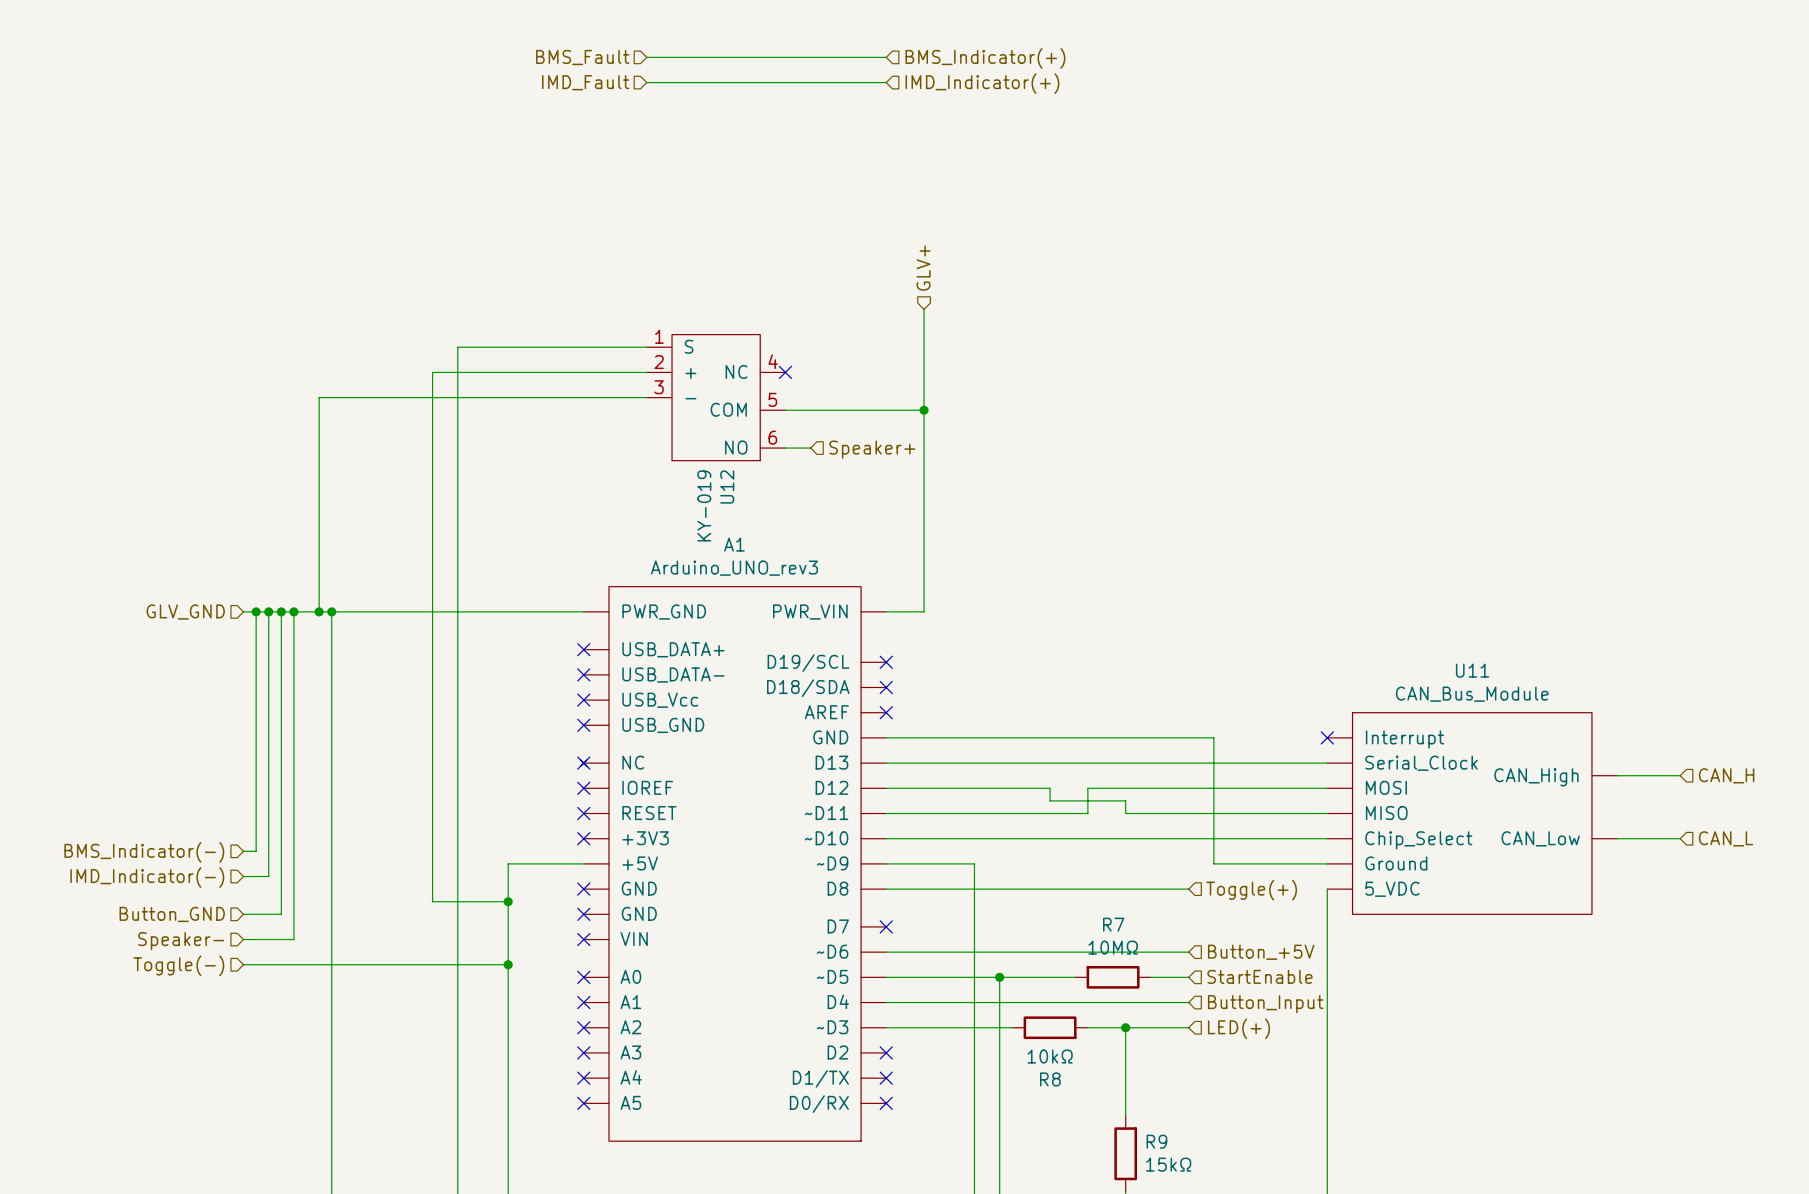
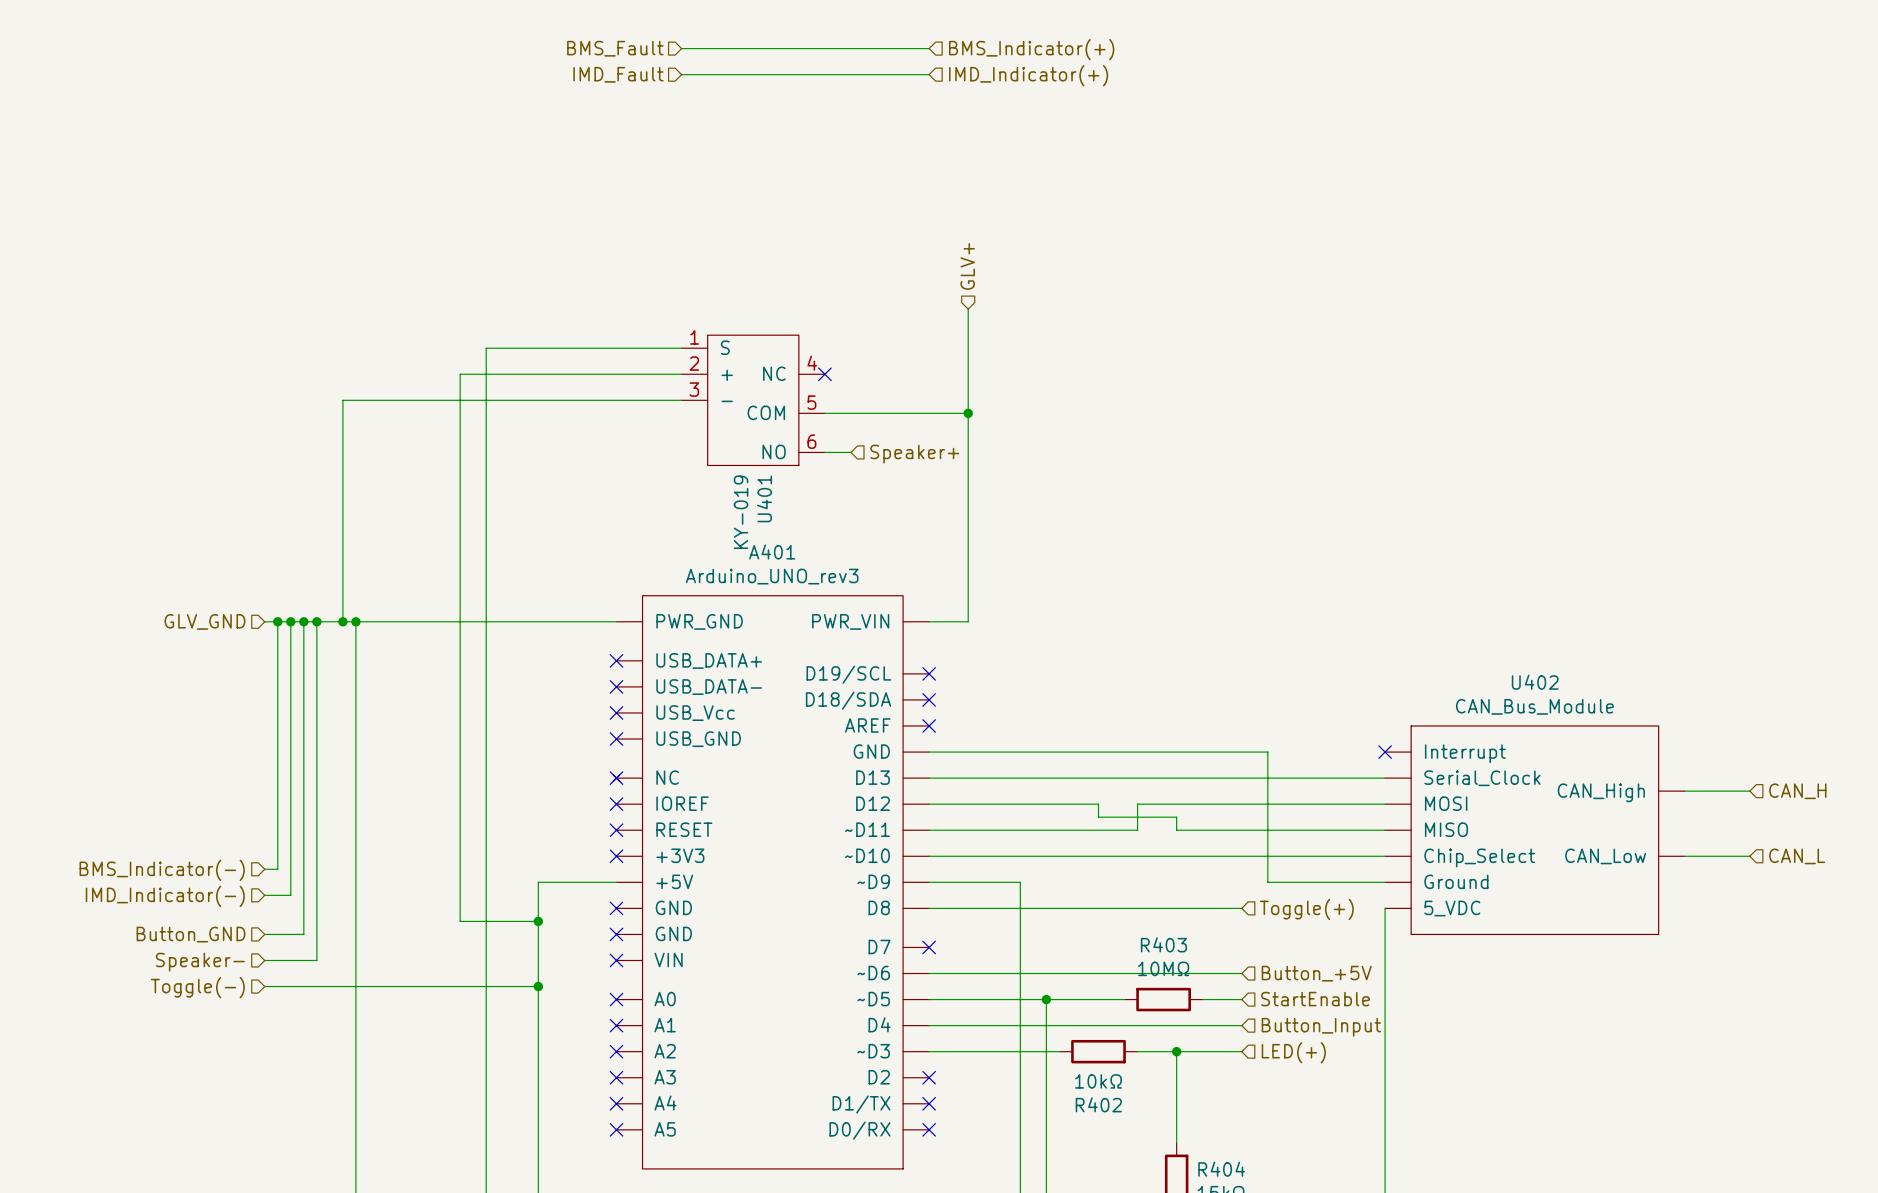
U12 name: U12 (727, 487) -> U401 (764, 498)
A1 name: A1 (734, 544) -> A401 (772, 551)
U11 name: U11 (1472, 670) -> U402 (1535, 682)
R7 name: R7 (1113, 924) -> R403 (1163, 944)
R8 name: R8 (1050, 1079) -> R402 (1098, 1104)
R9 name: R9 (1156, 1141) -> R404 (1221, 1169)

